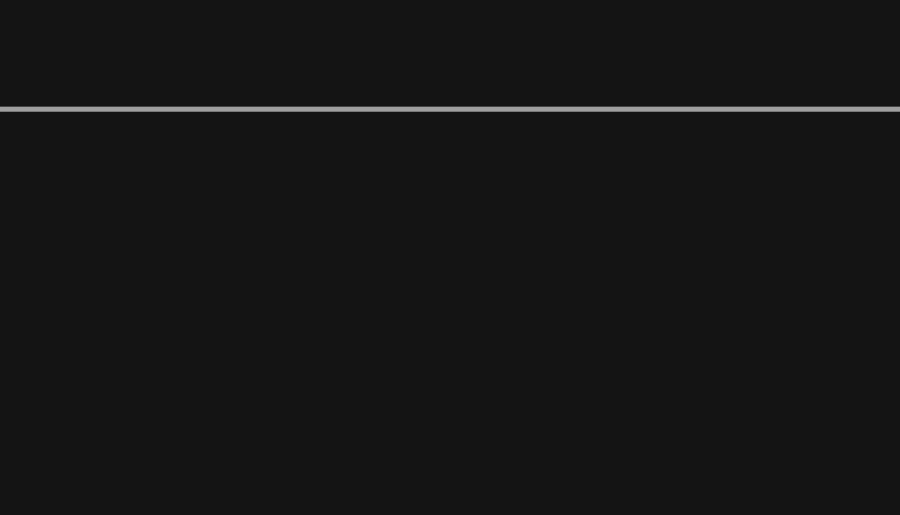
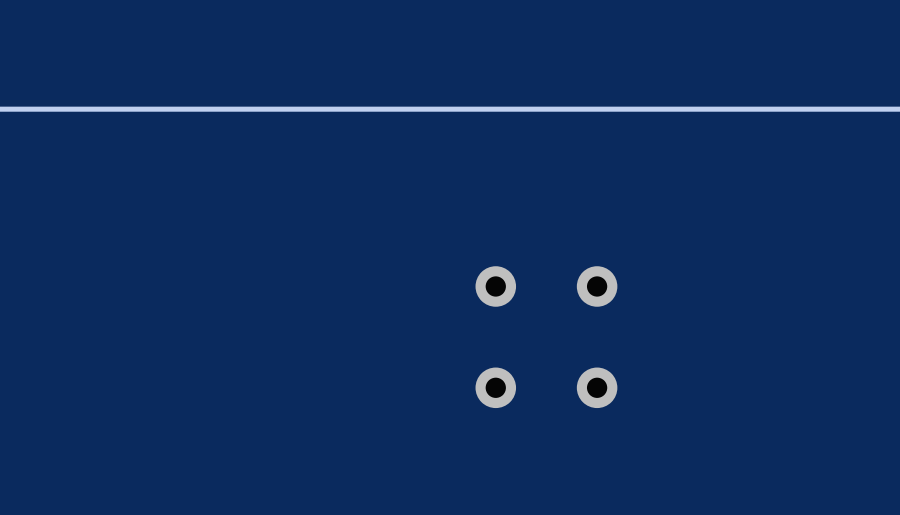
via: none -> (495, 286)
via: none -> (597, 286)
via: none -> (495, 387)
via: none -> (597, 387)

